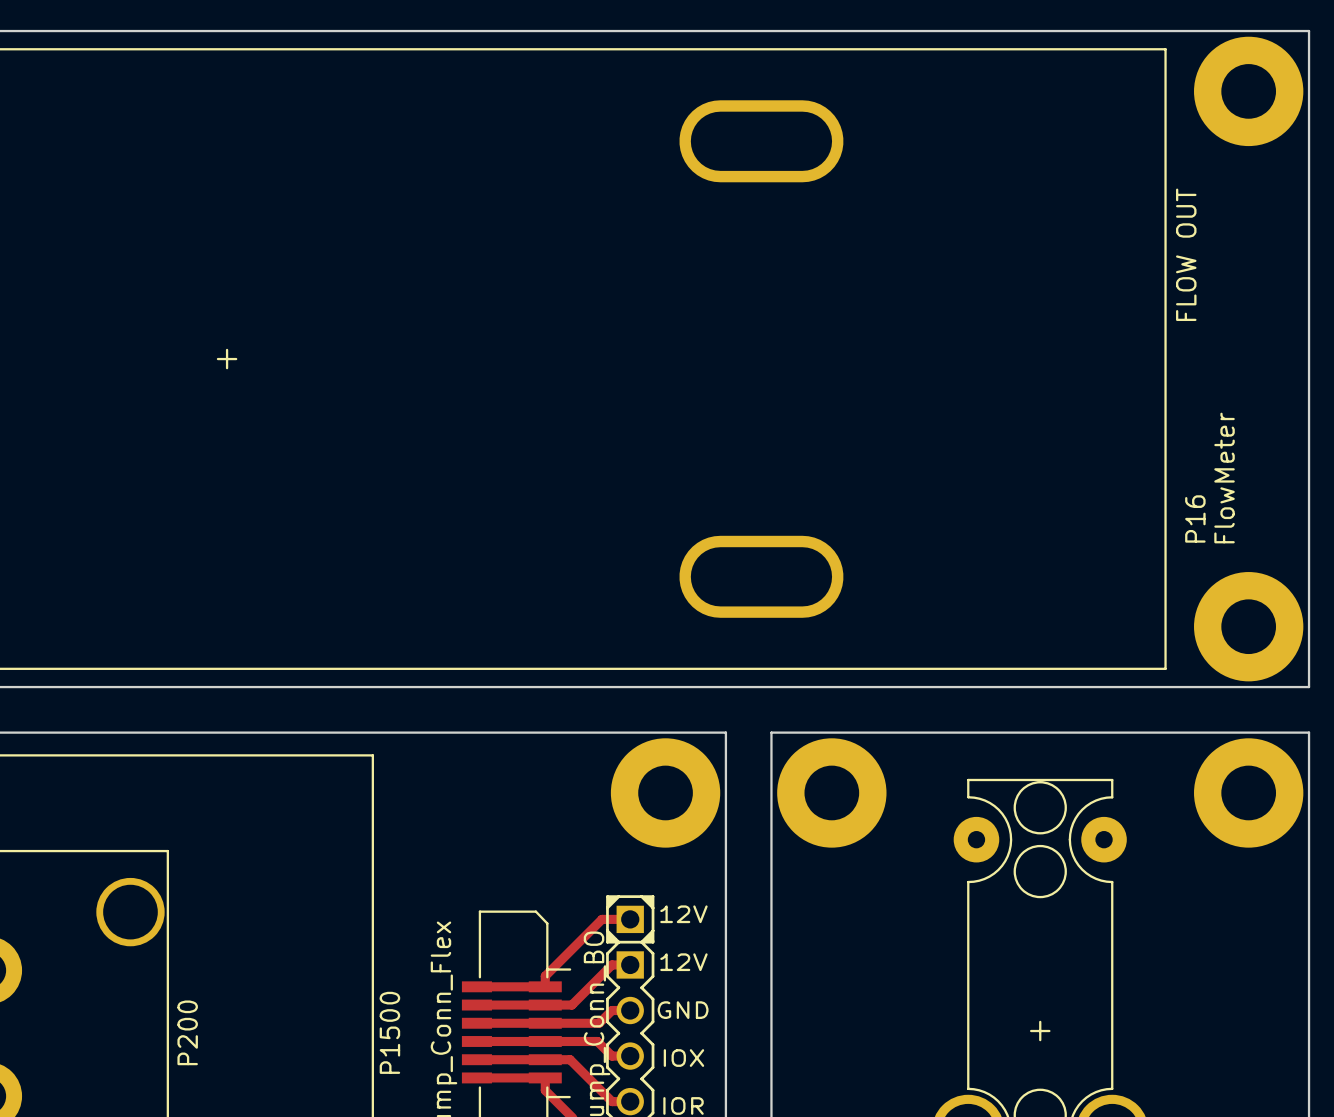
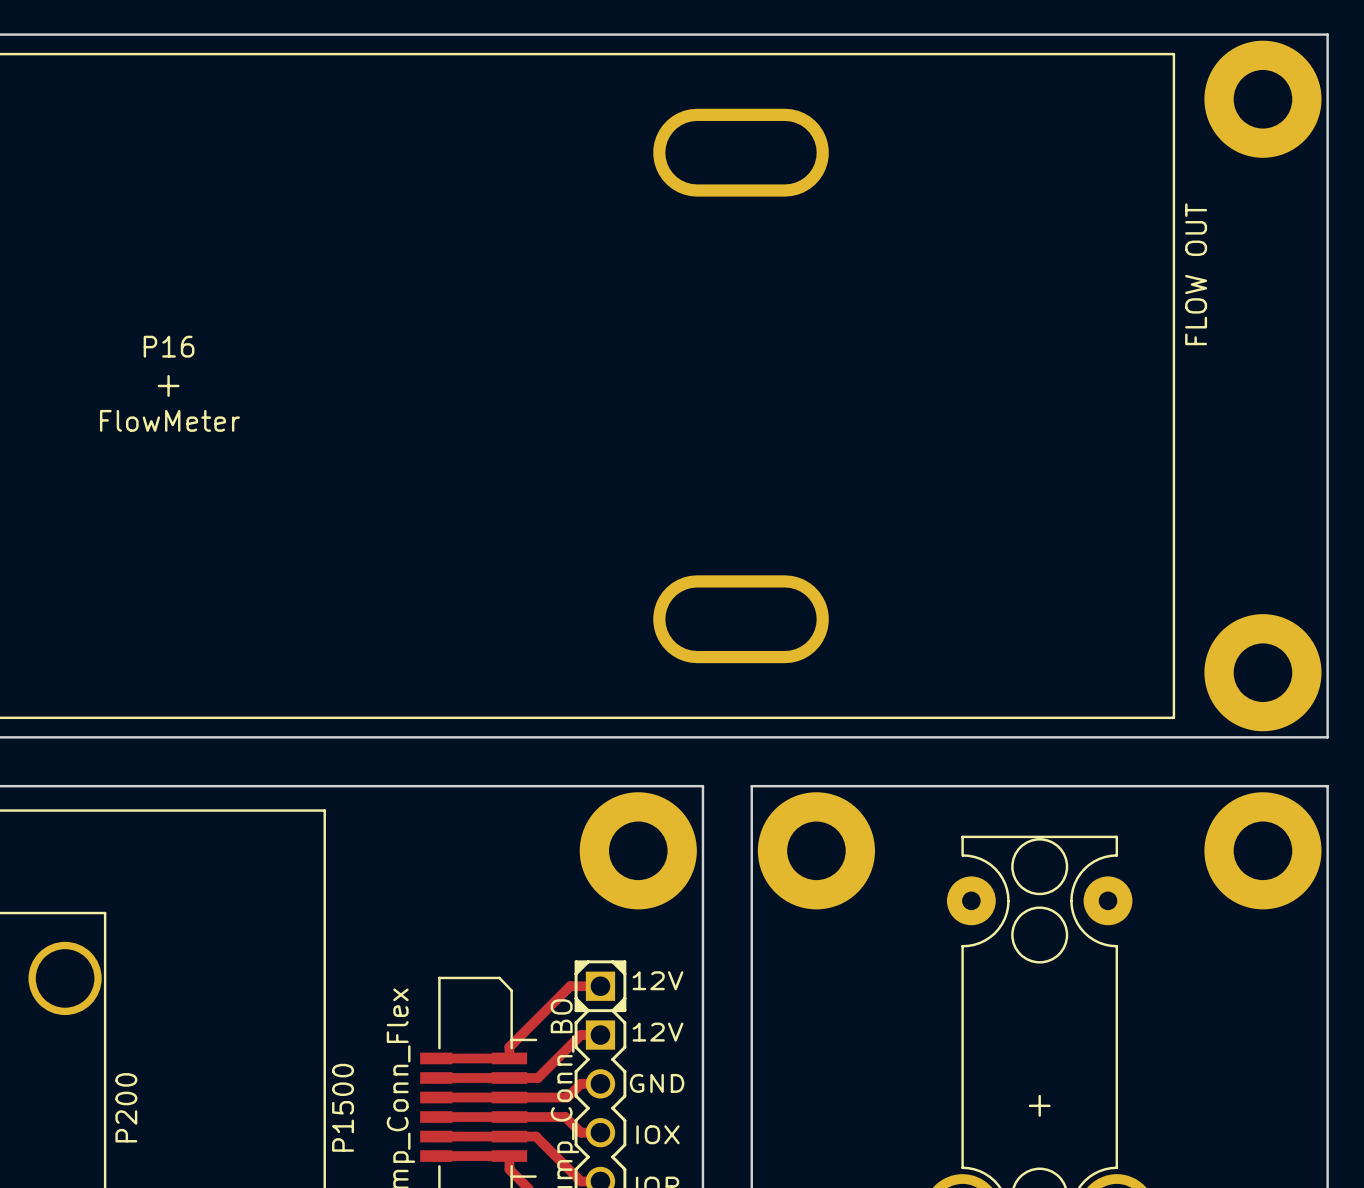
P16 value rotation: 0° (1224, 478) -> 90° clockwise (169, 420)
P16 value position: FlowMeter (1224, 478) -> FlowMeter (169, 420)
P16 name rotation: 0° (1195, 518) -> 90° clockwise (169, 346)
P16 name position: P16 (1195, 518) -> P16 (169, 346)

